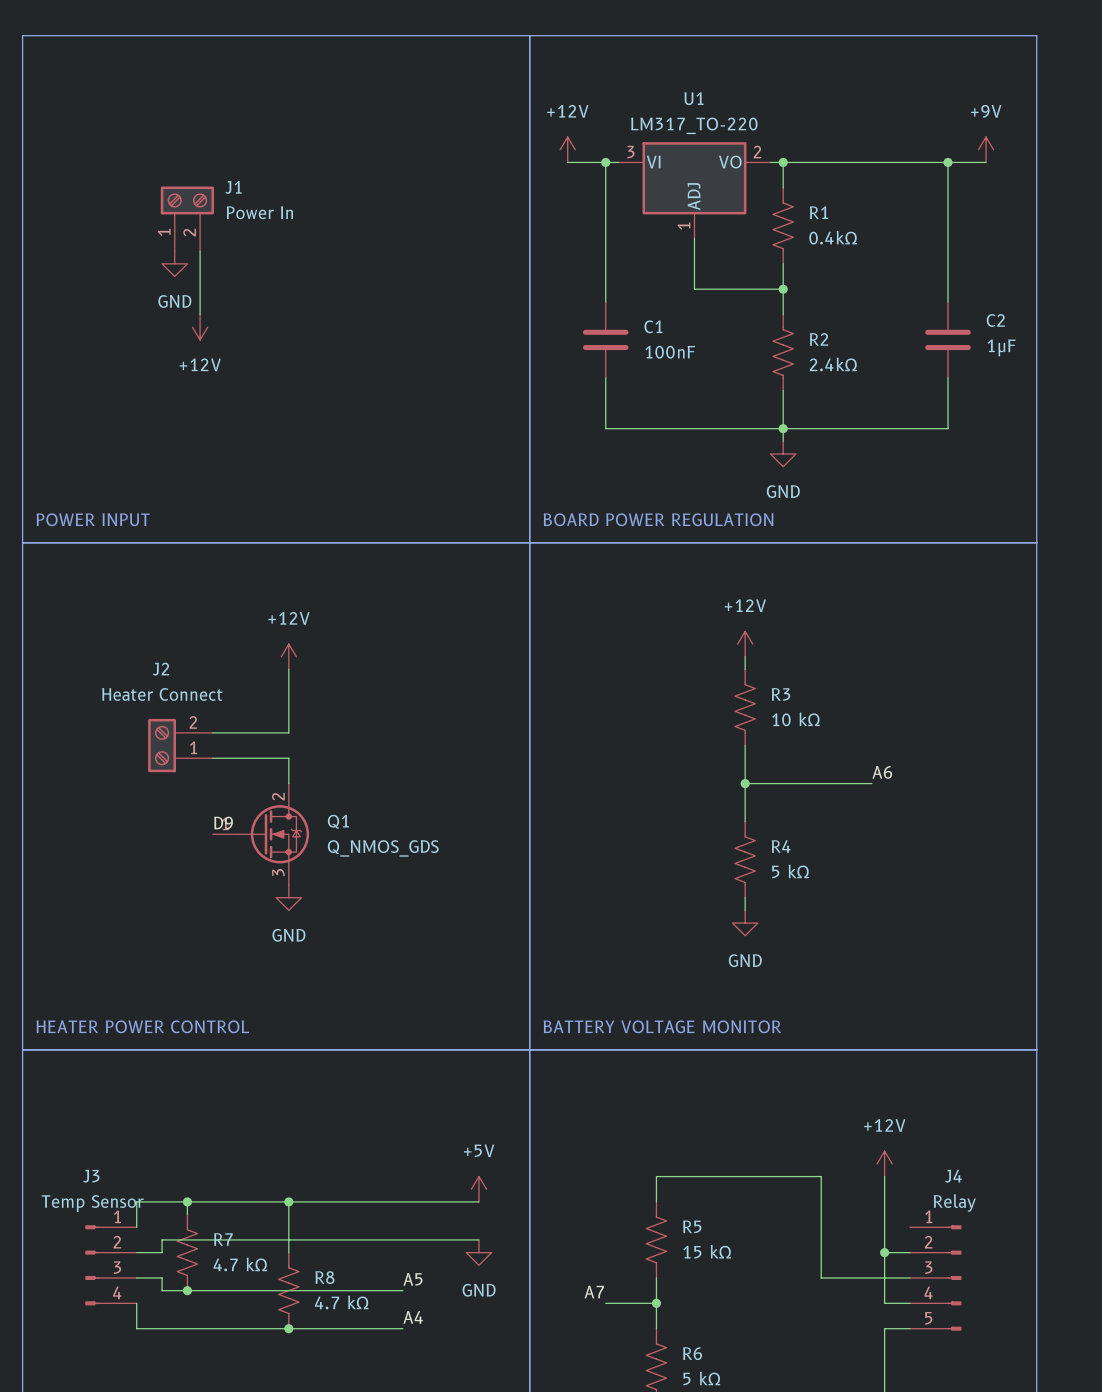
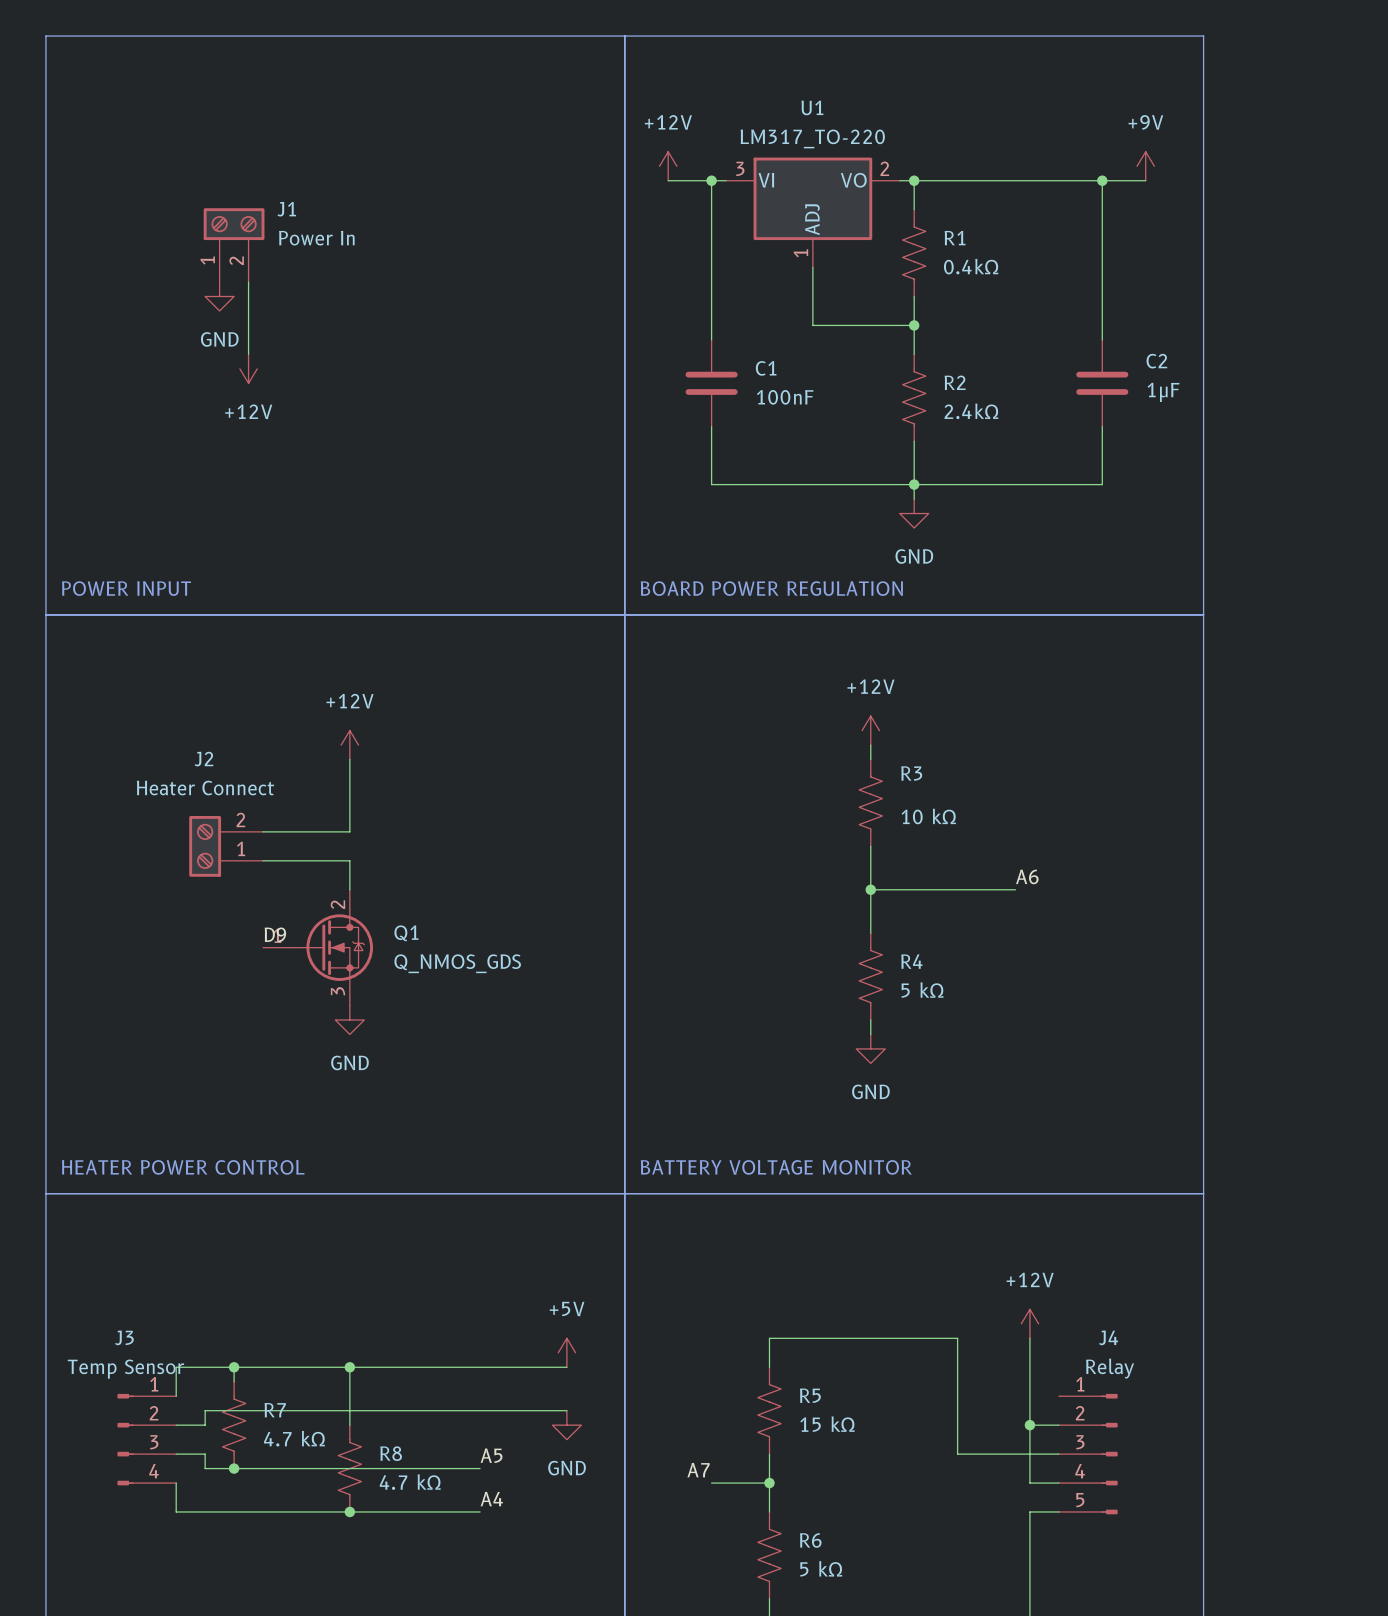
R3 name position: R3 (781, 694) -> R3 (911, 773)

